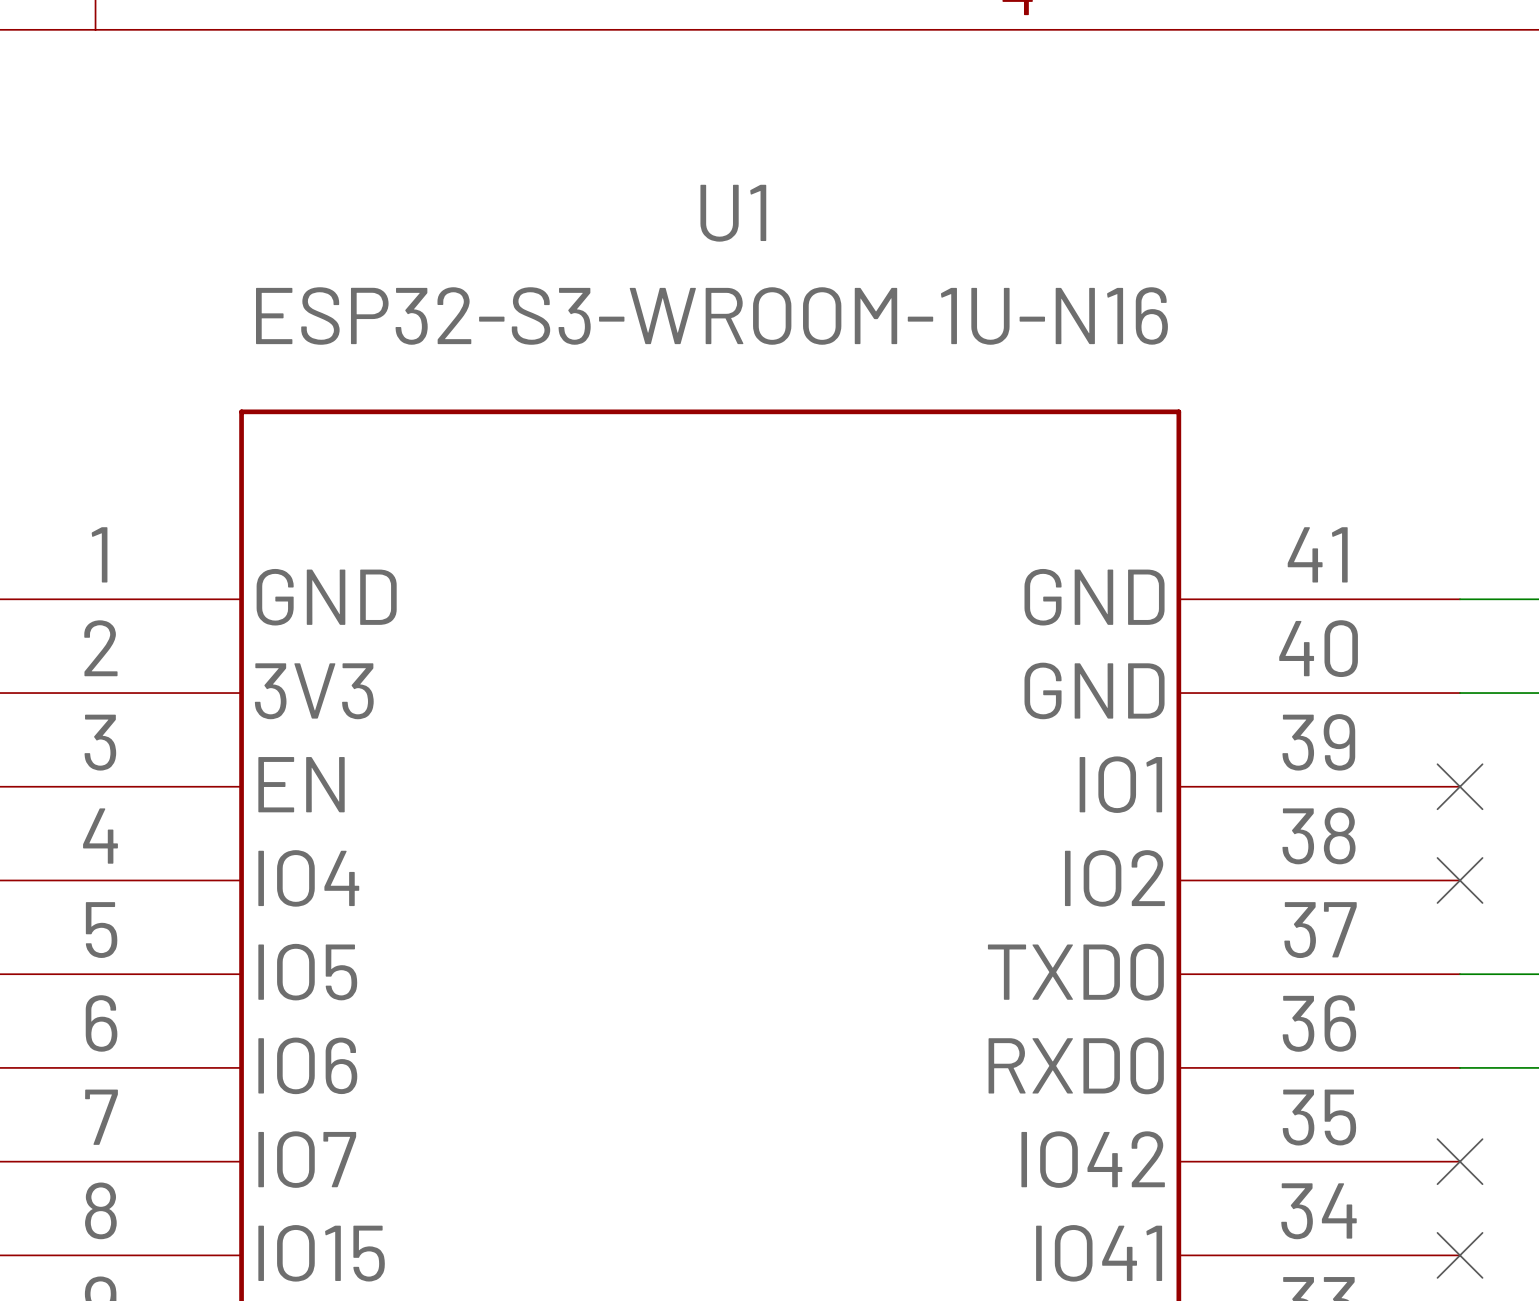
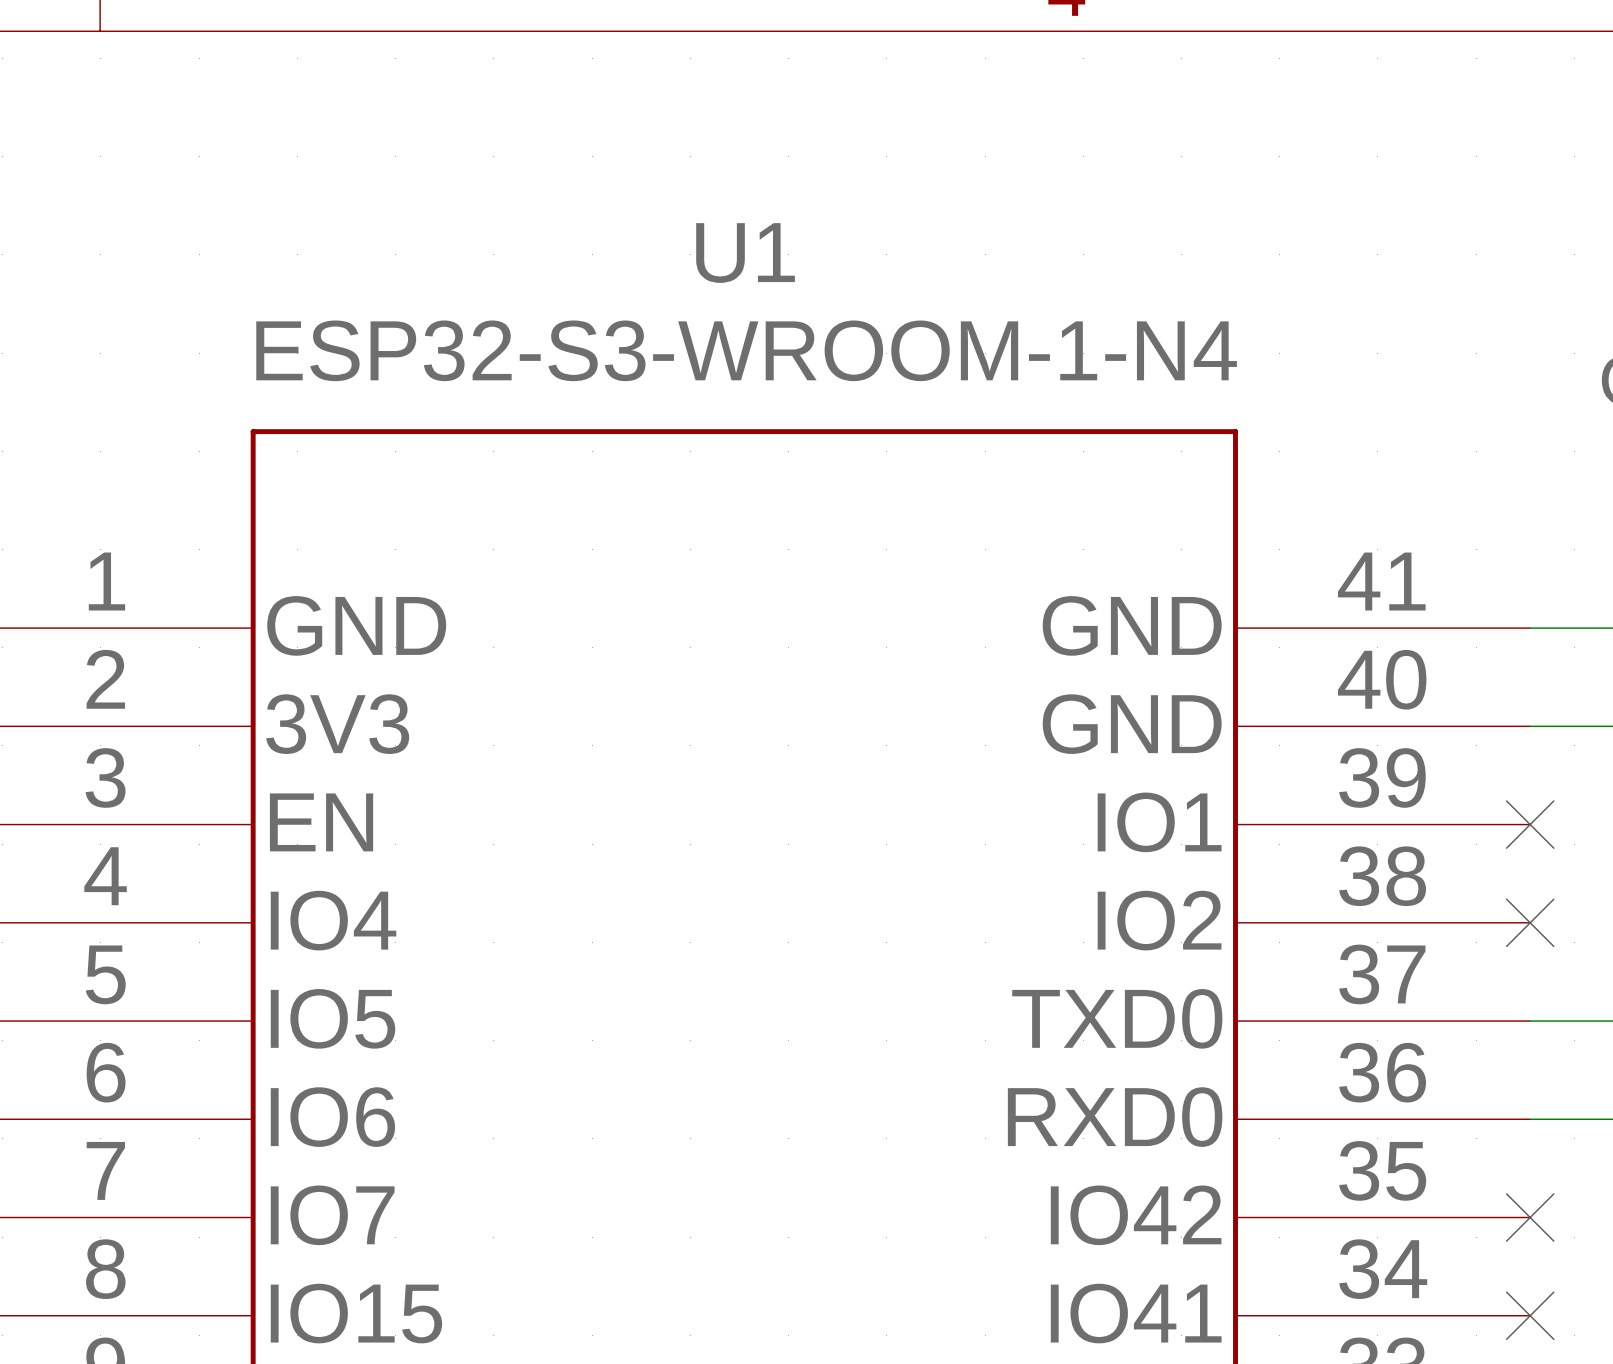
U1 name position: U1 (733, 213) -> U1 (745, 253)
U1 value: ESP32-S3-WROOM-1U-N16 (711, 316) -> ESP32-S3-WROOM-1-N4 (746, 350)

